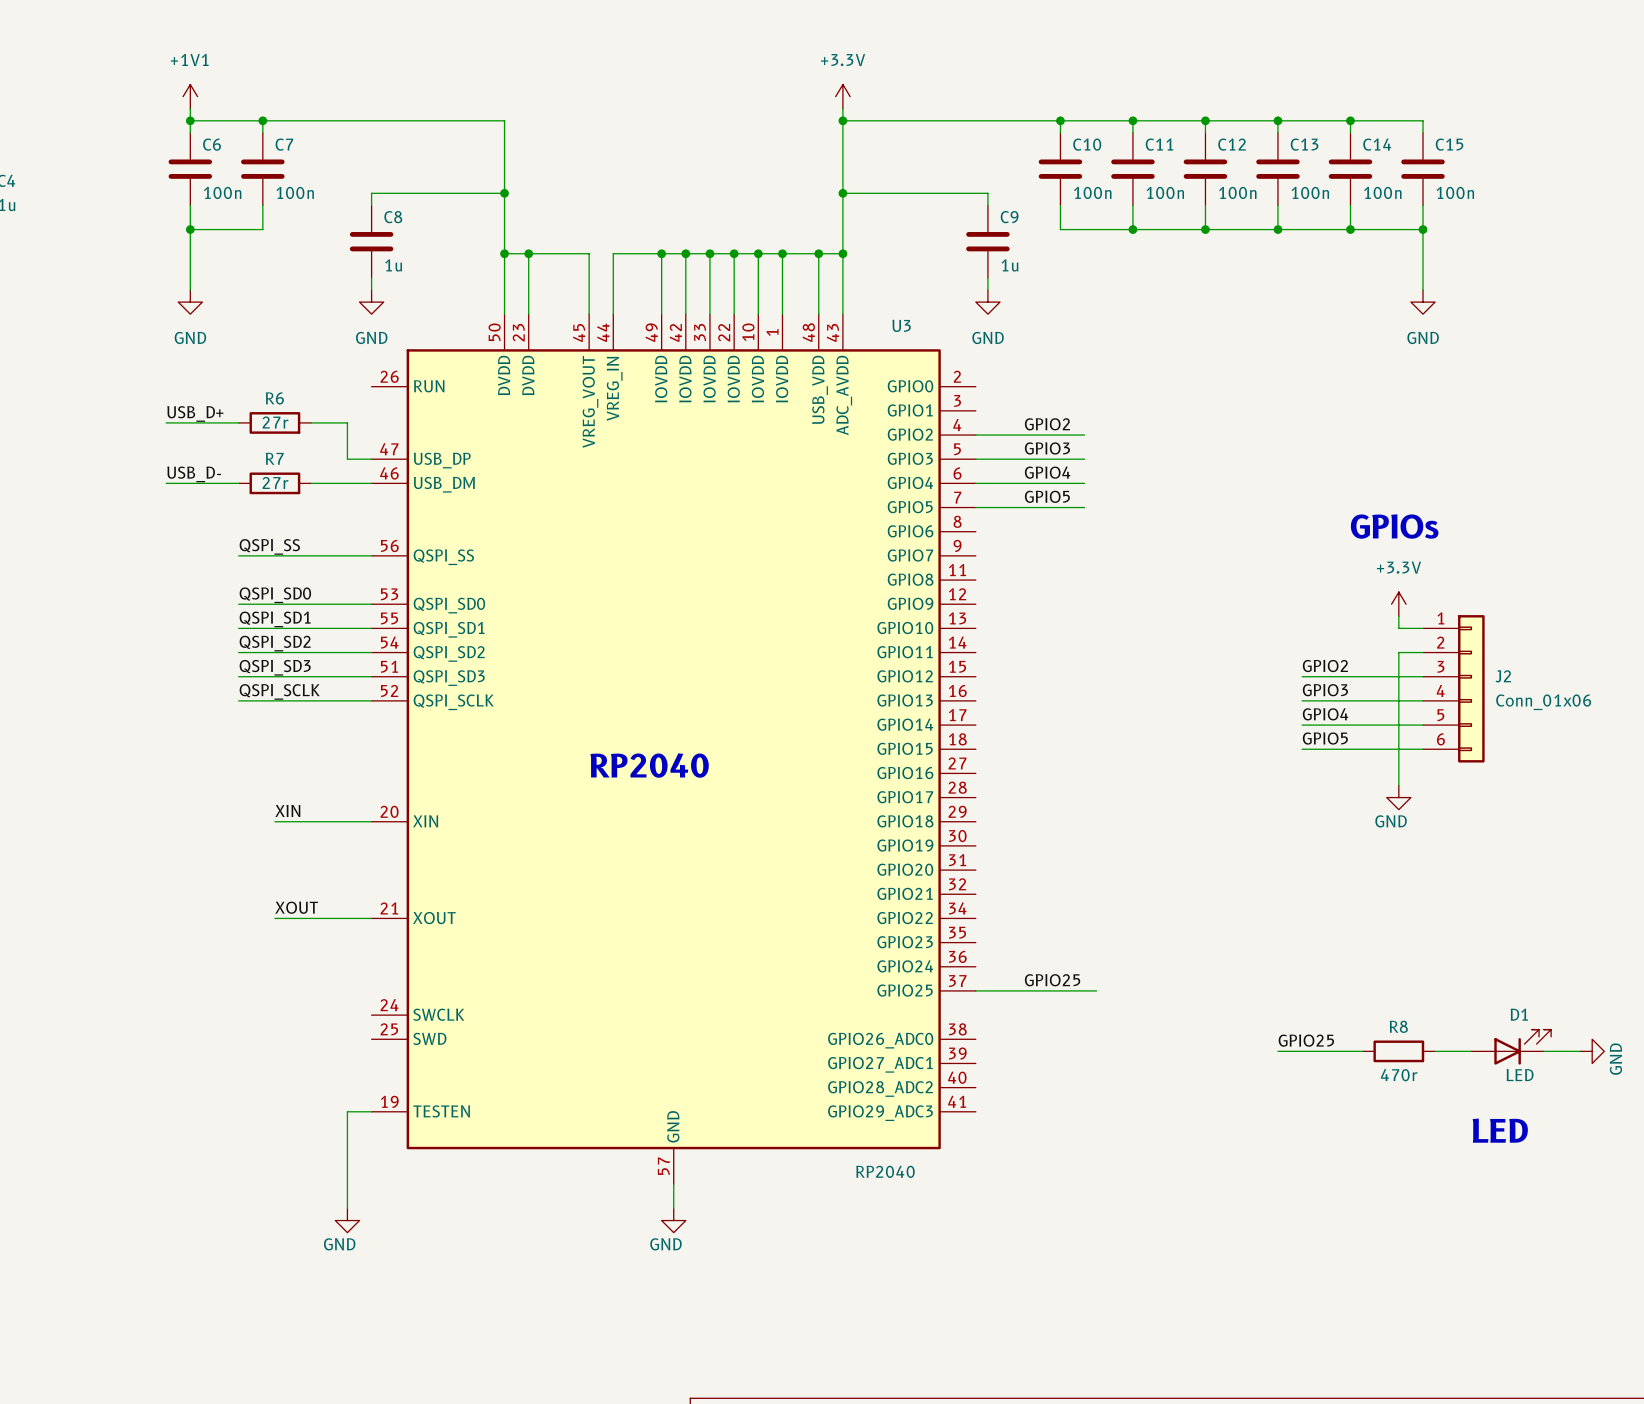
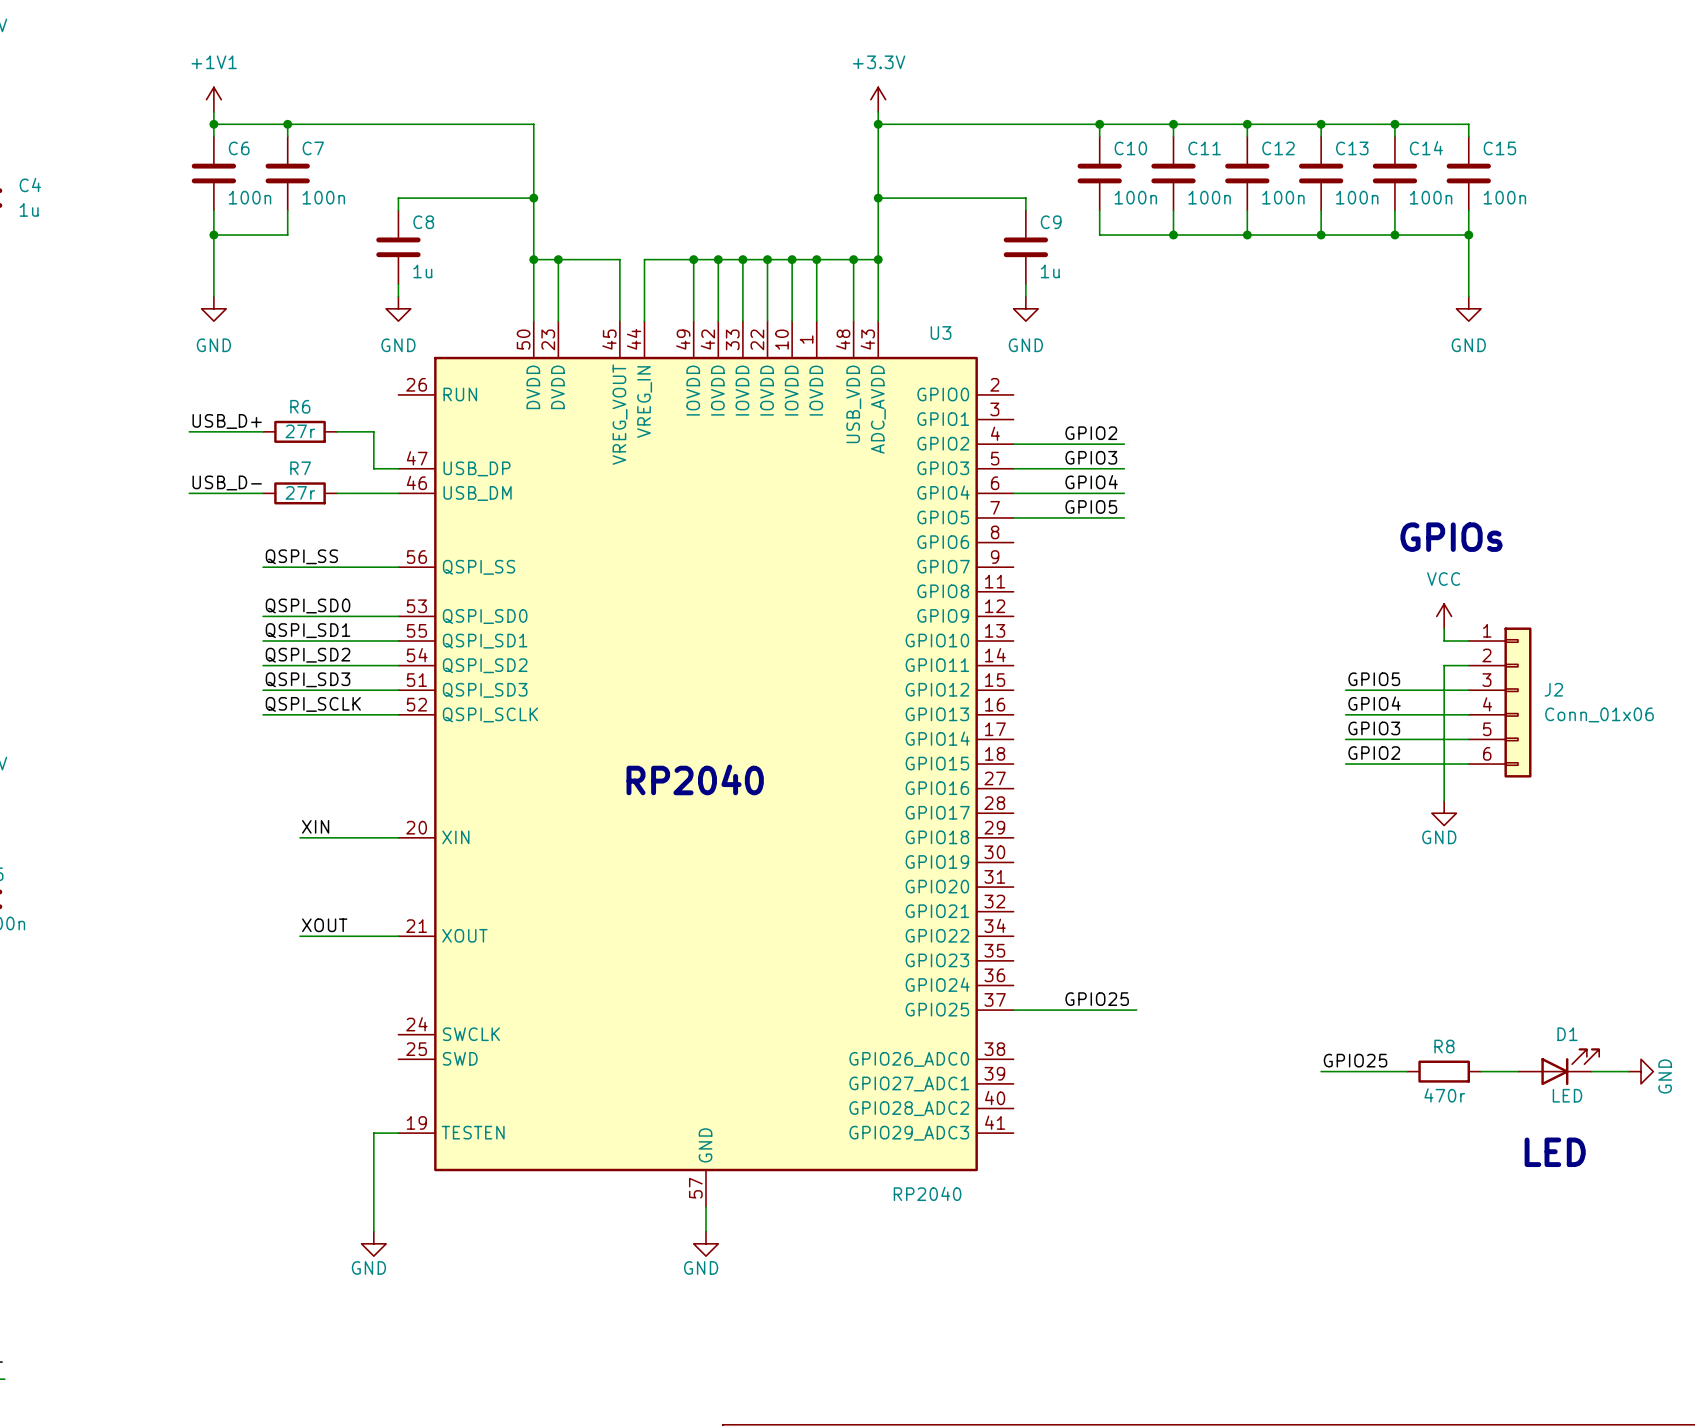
power symbol: +3.3V (1398, 604) -> VCC (1444, 616)
label: GPIO2 (1325, 666) -> GPIO5 (1374, 679)
label: GPIO3 (1325, 690) -> GPIO4 (1374, 703)
label: GPIO4 (1325, 714) -> GPIO3 (1374, 728)
label: GPIO5 (1325, 738) -> GPIO2 (1374, 753)

